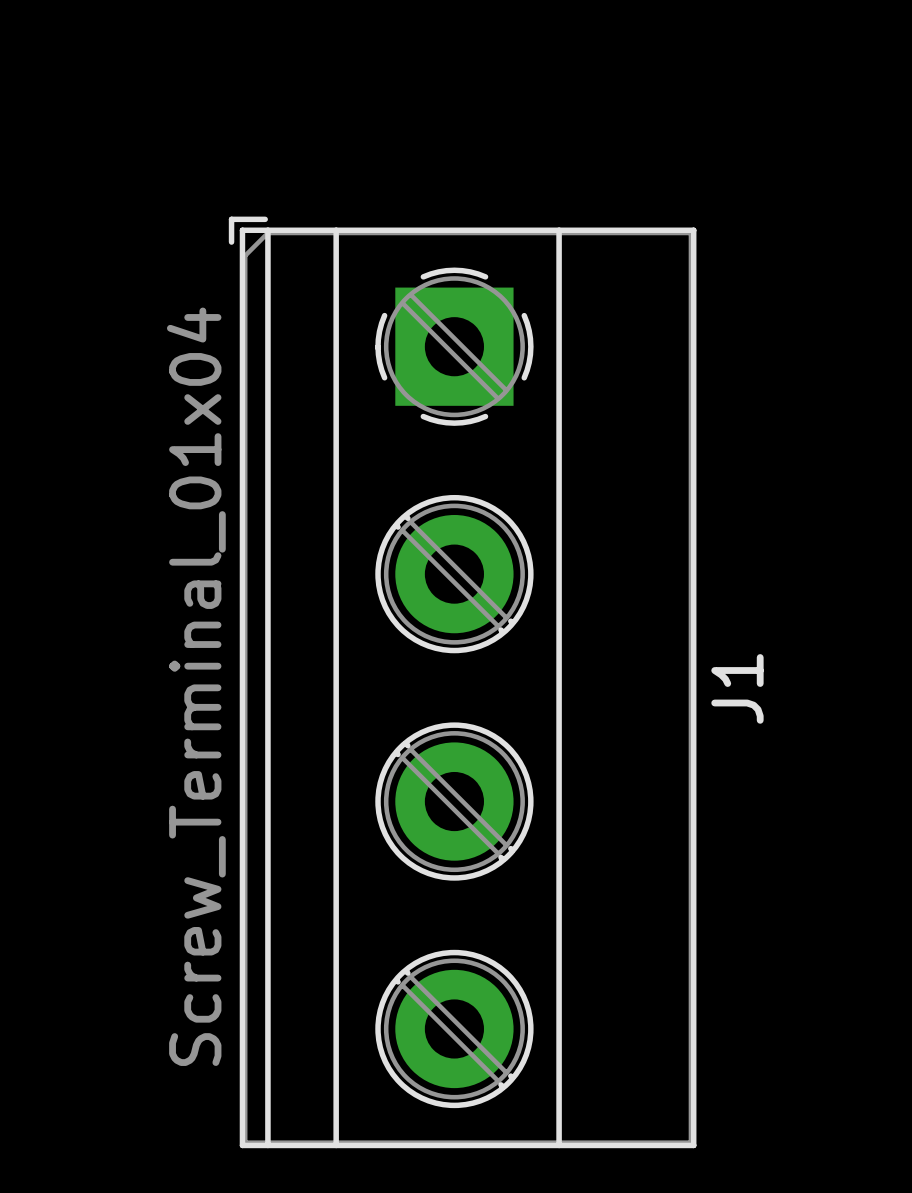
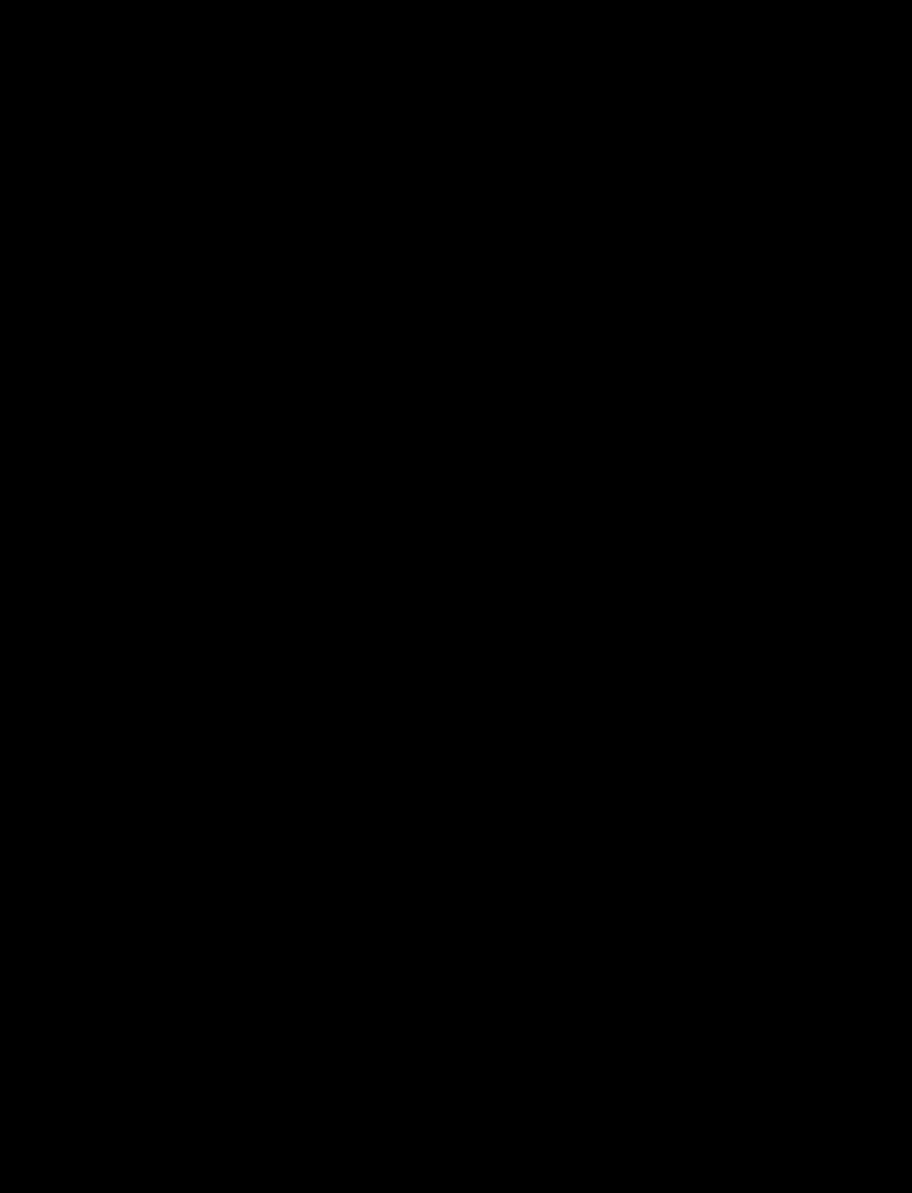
J1: Screw_Terminal_01x04 (462, 682) -> none

